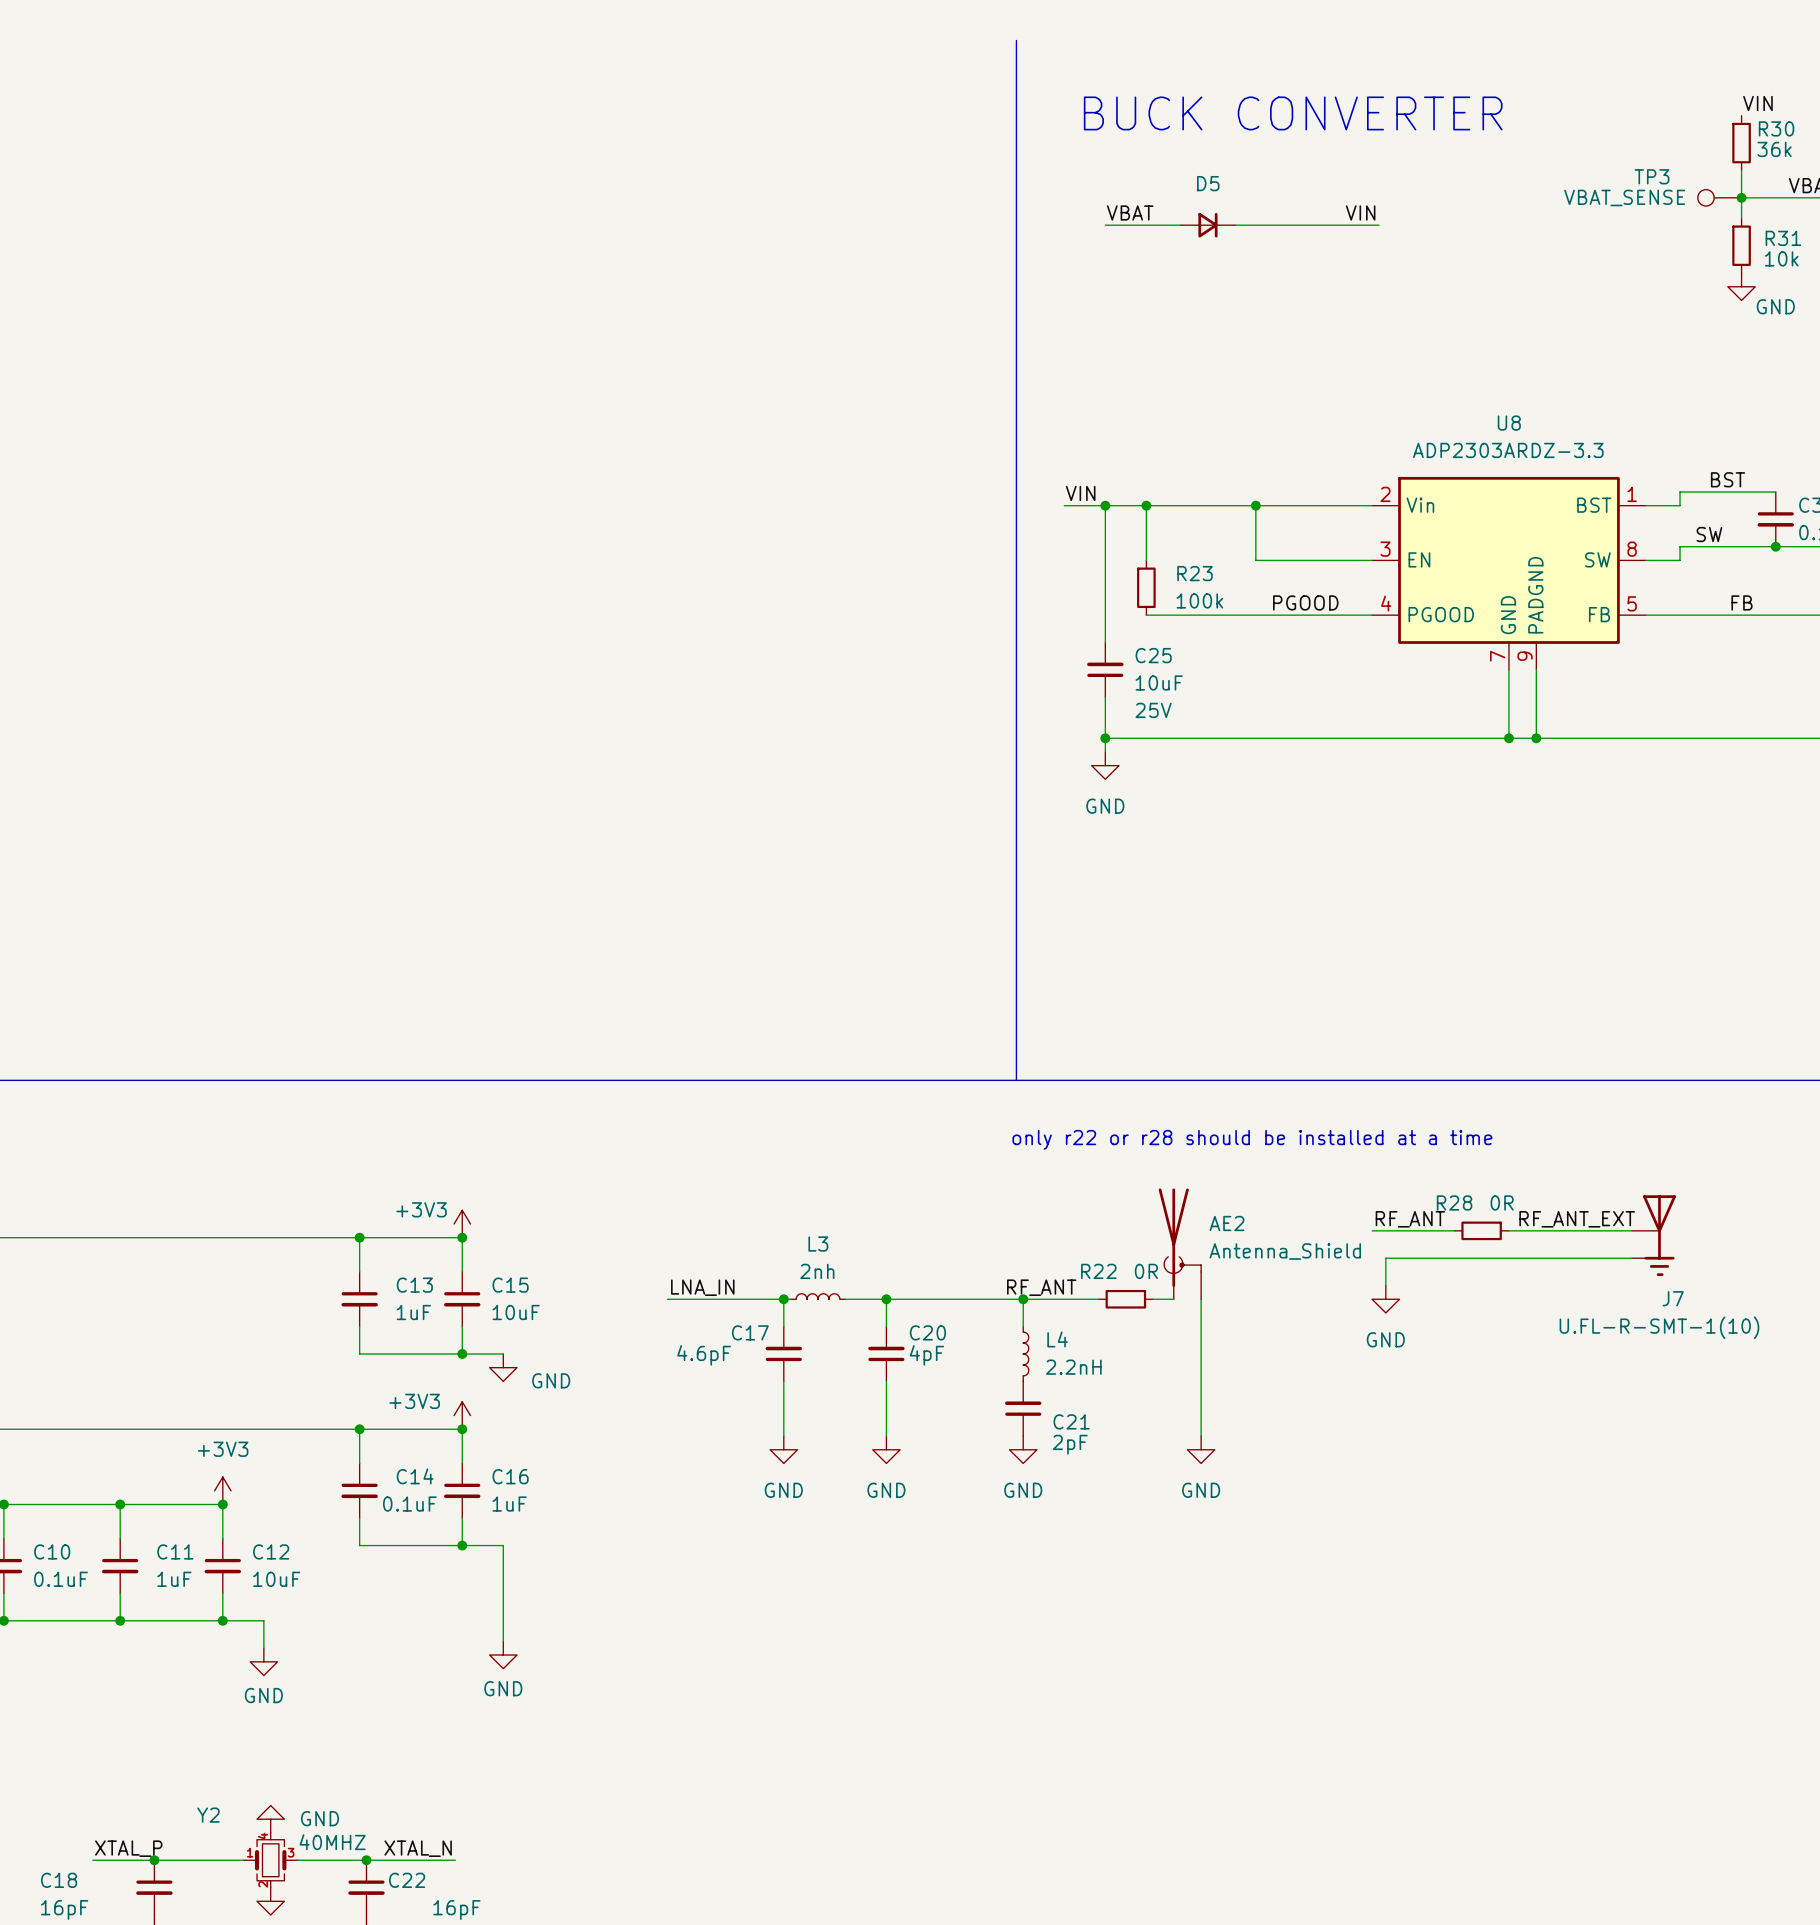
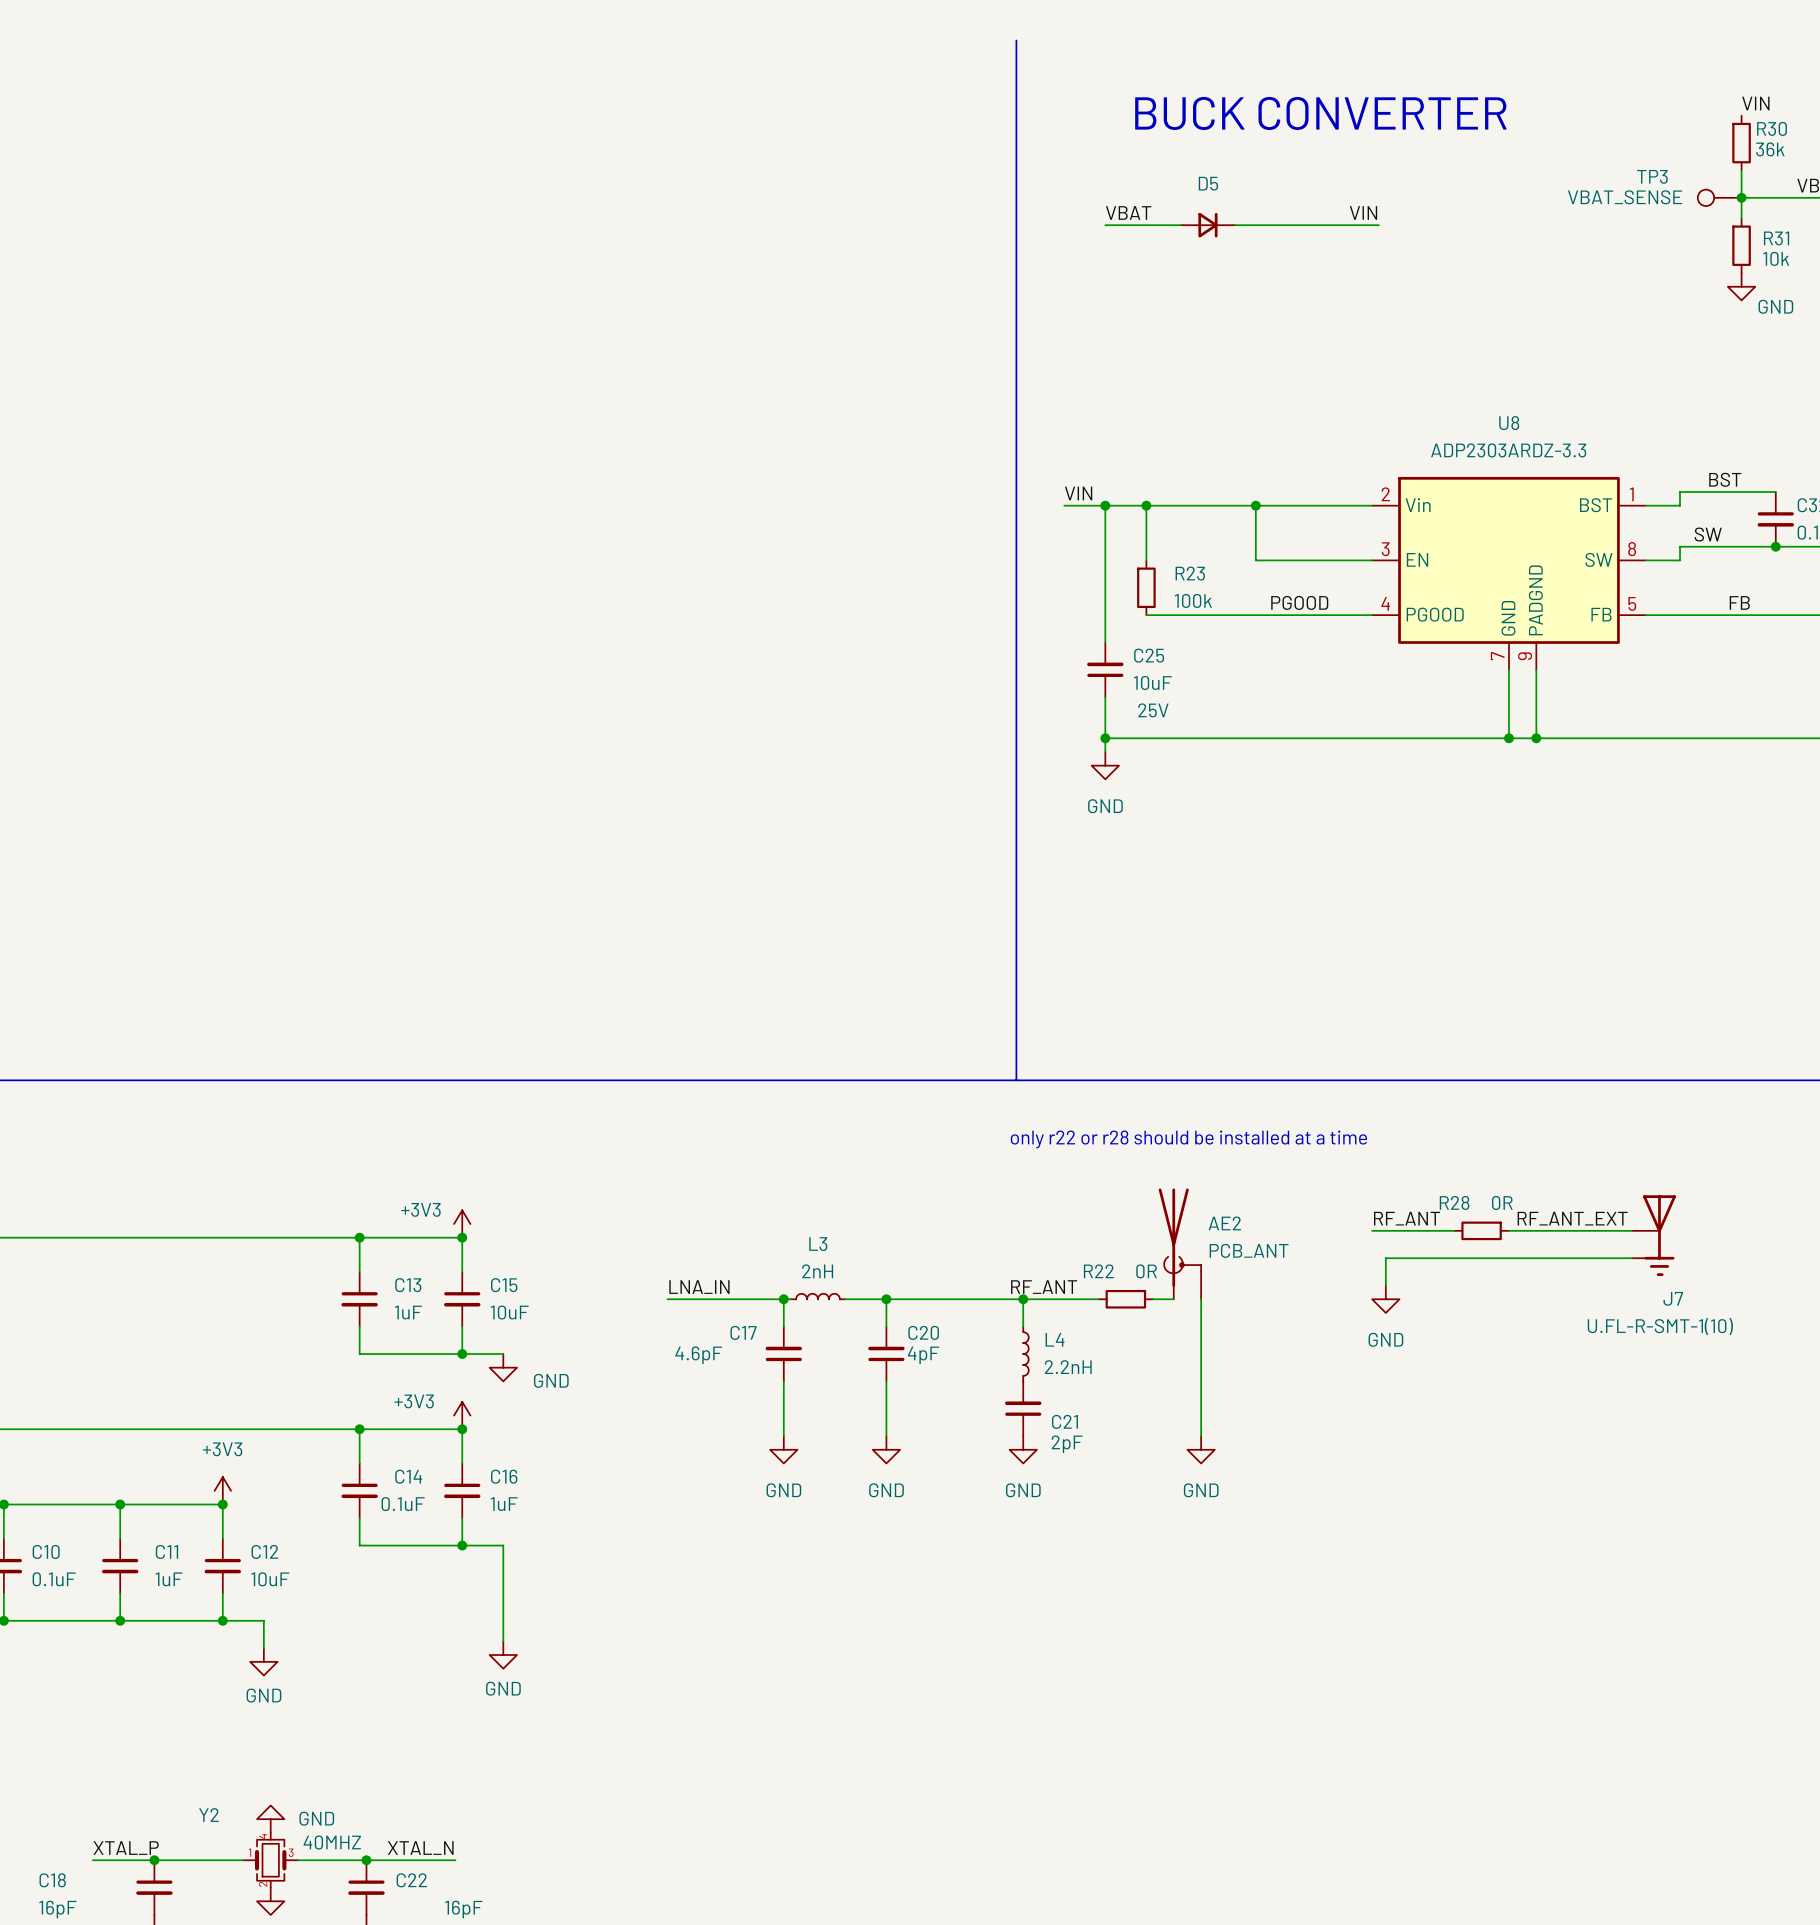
AE2 value: Antenna_Shield (1285, 1251) -> PCB_ANT (1249, 1250)
L3 value: 2nh (817, 1271) -> 2nH (817, 1271)

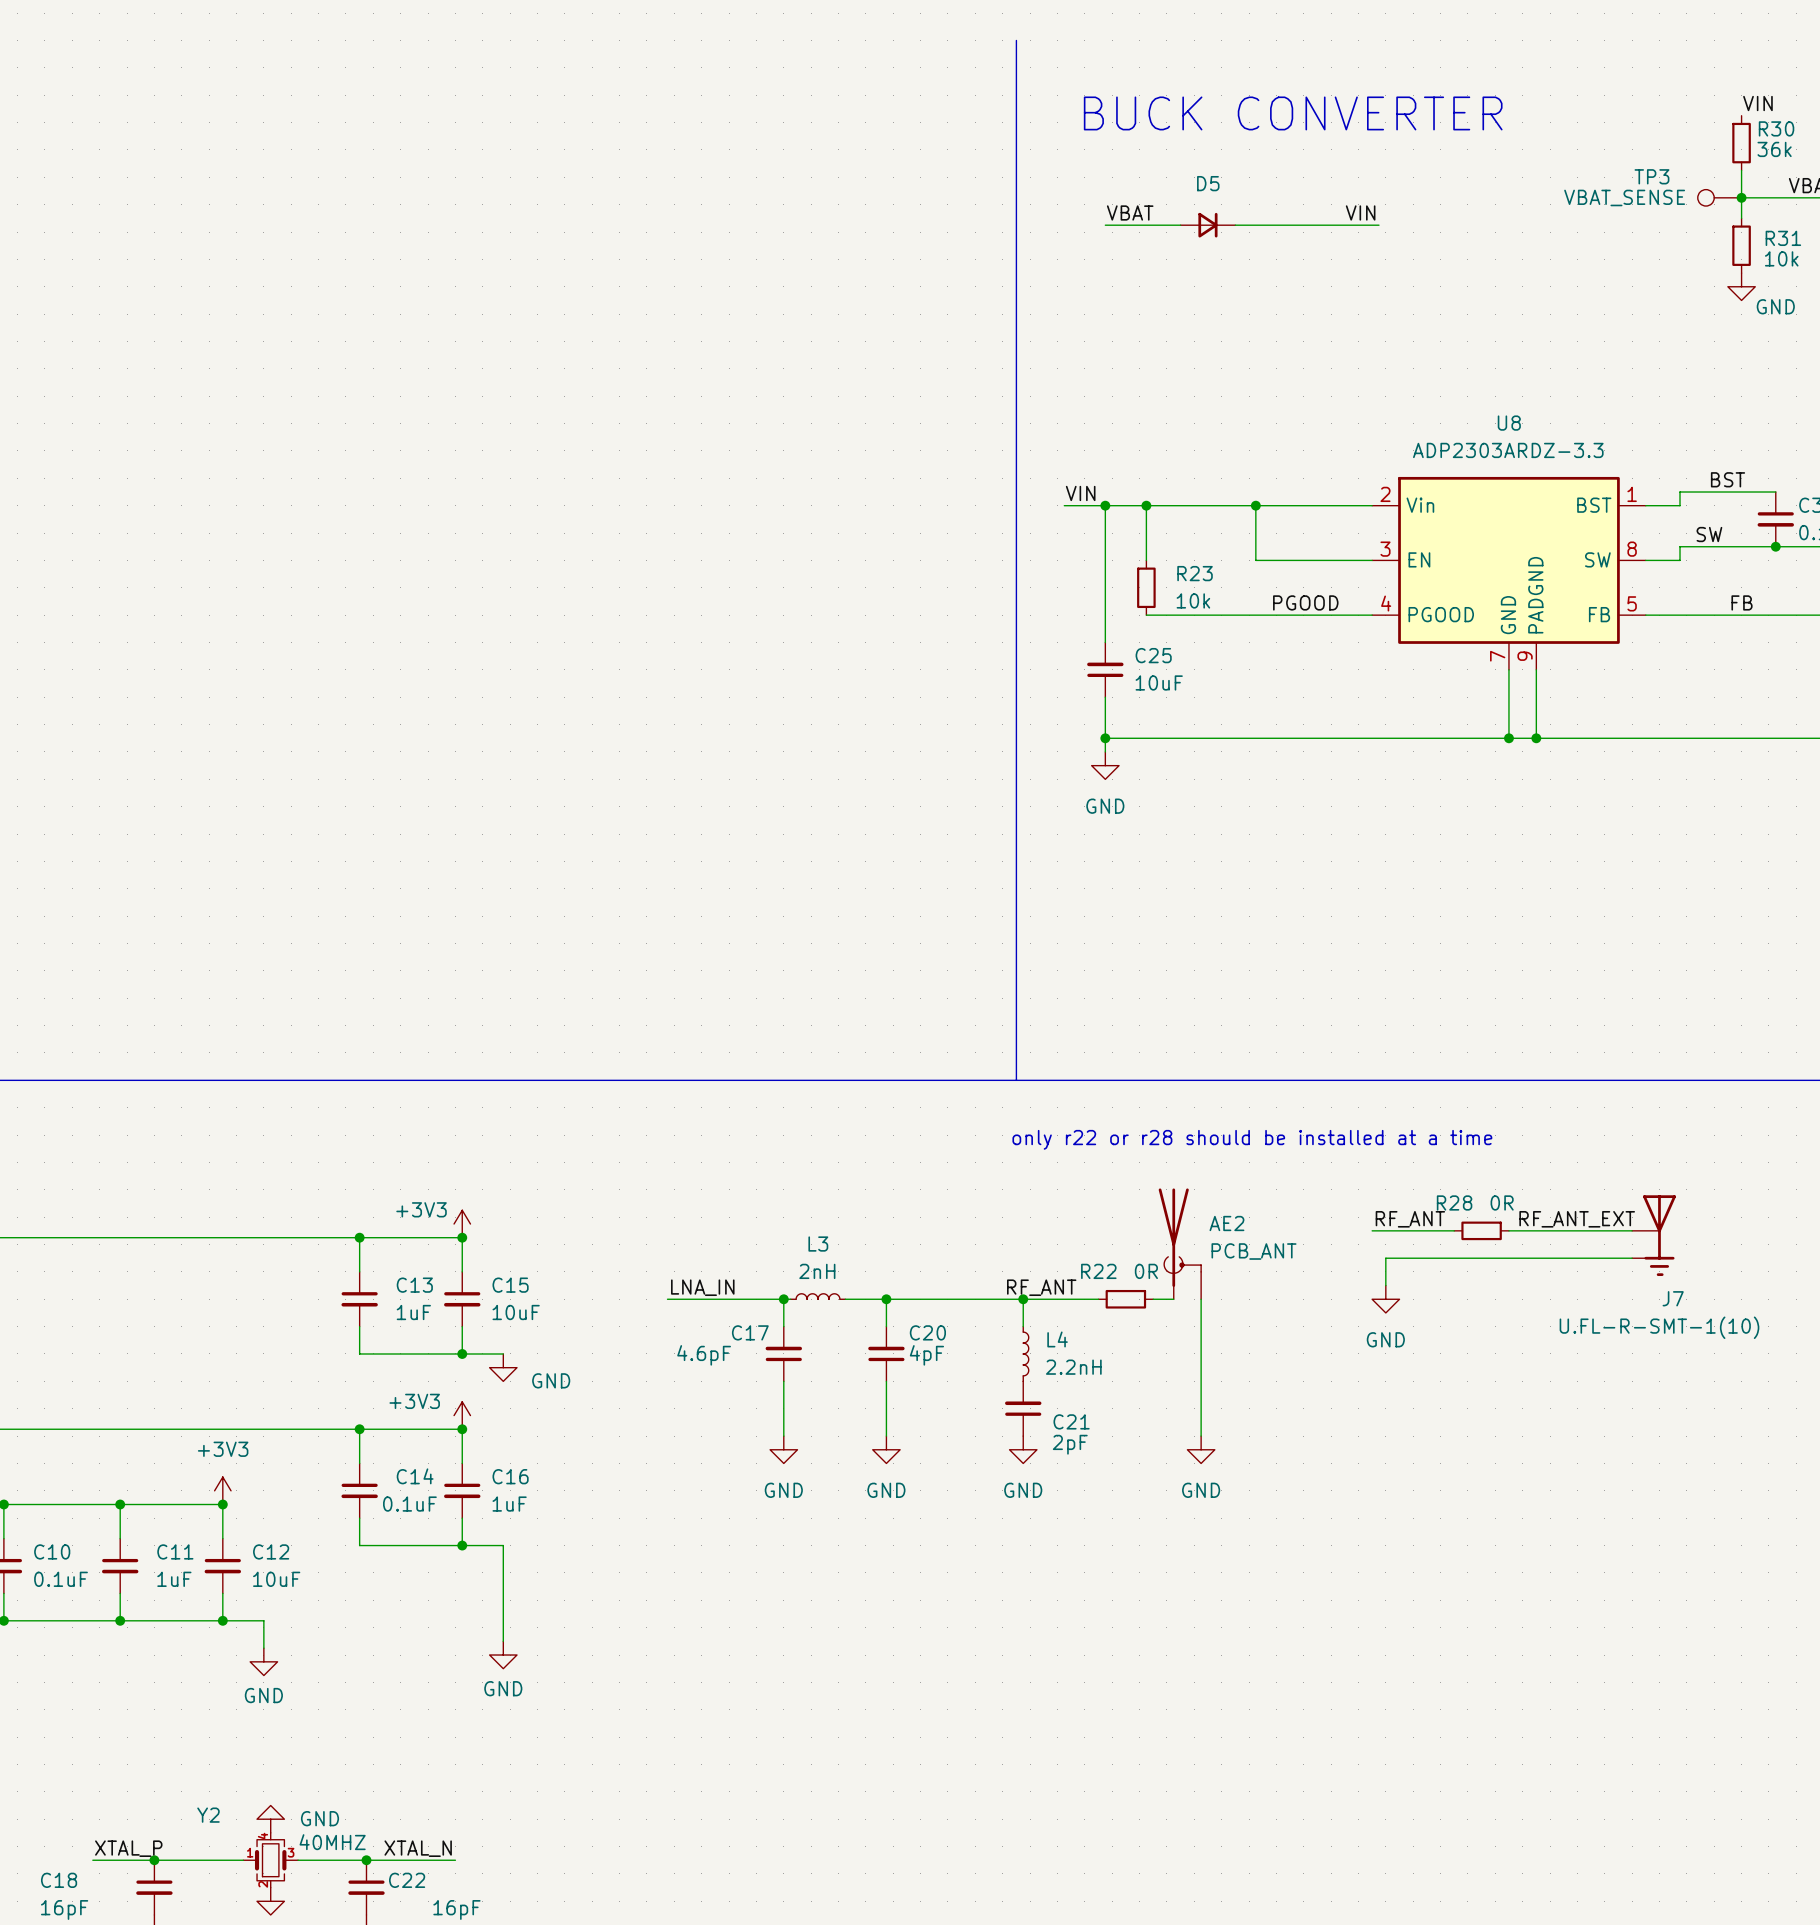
R23 value: 100k (1193, 600) -> 10k (1193, 600)
C25 text: 25V (1153, 710) -> none

